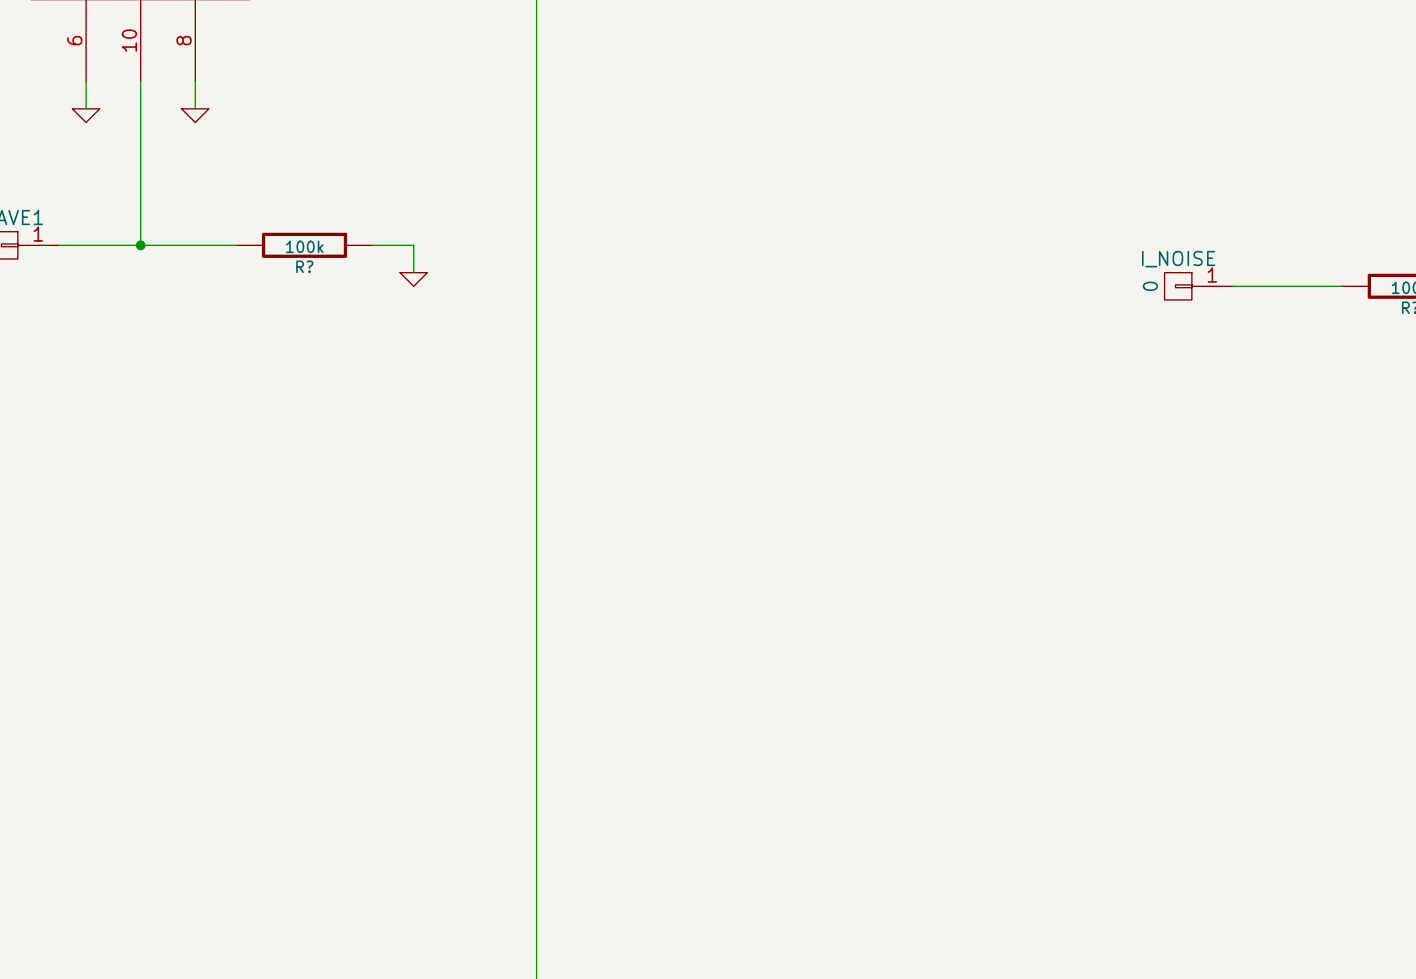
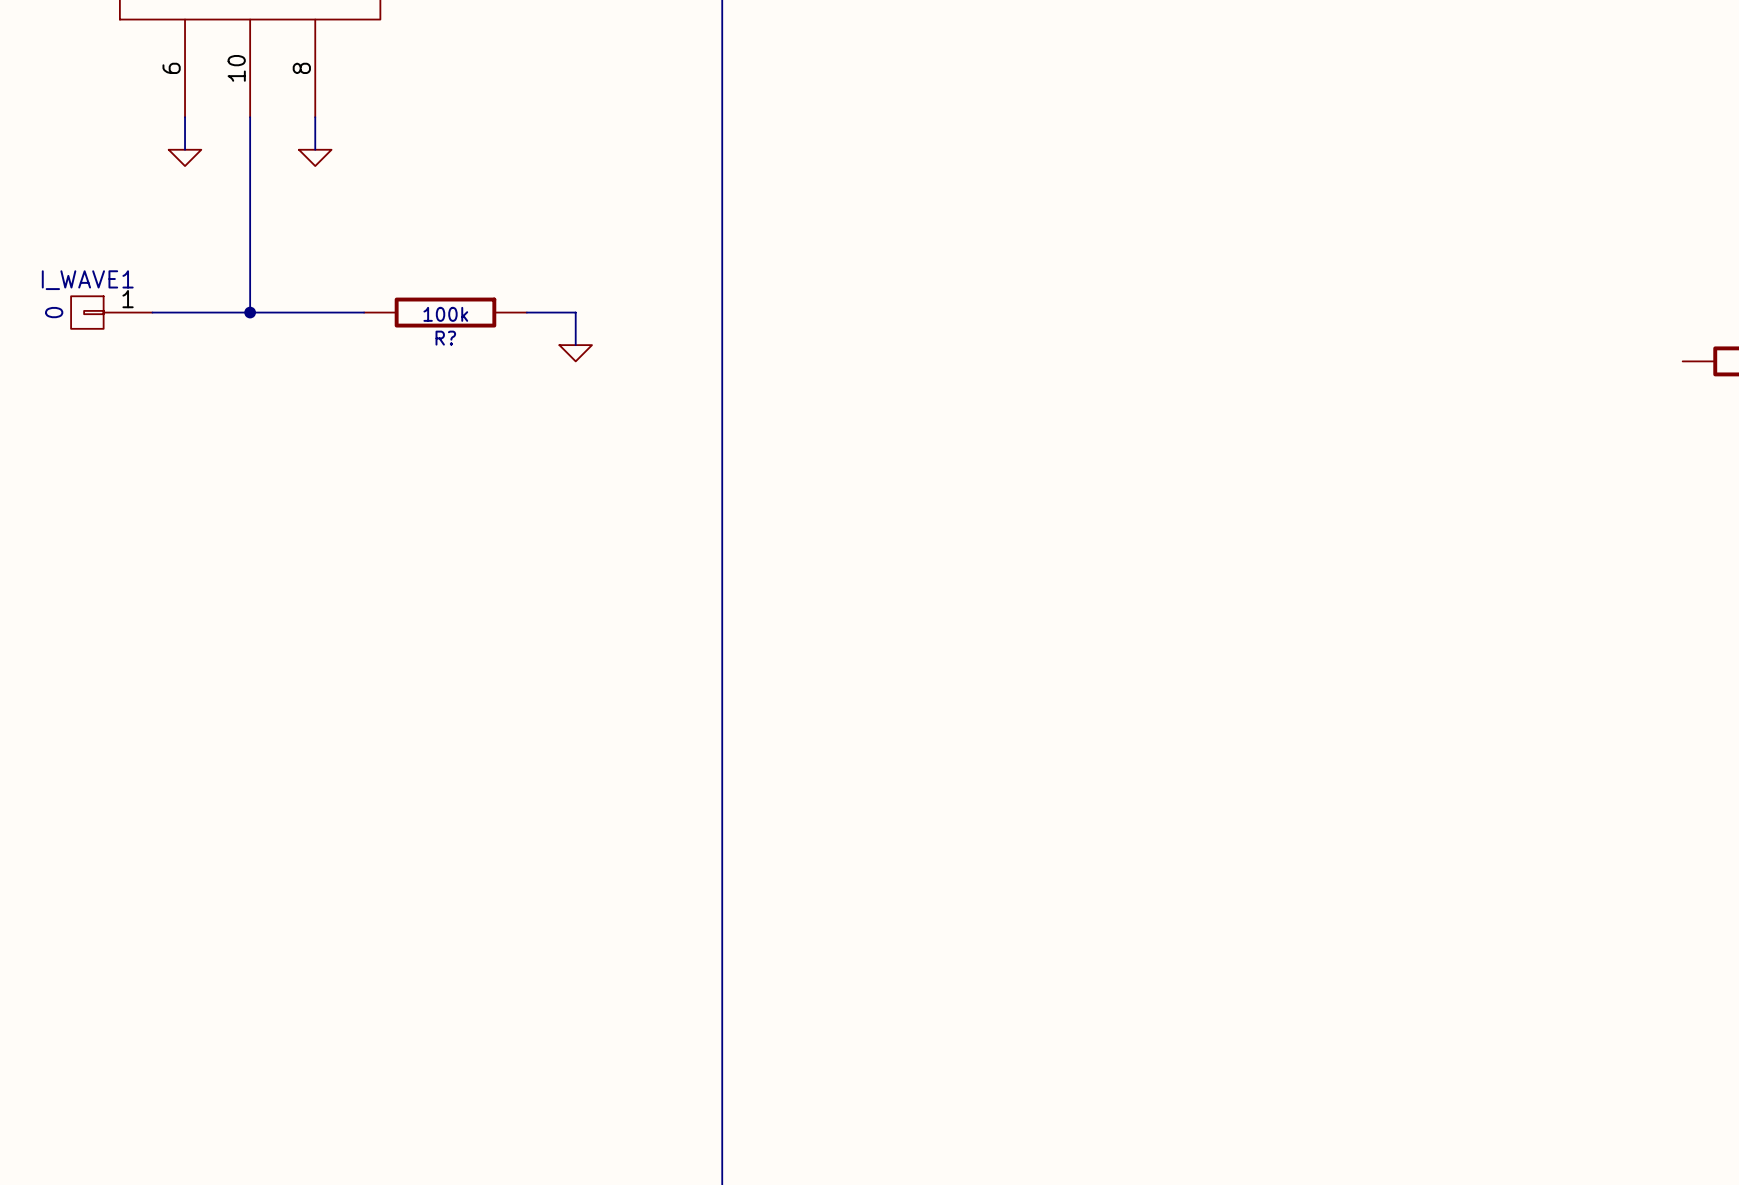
I_NOISE: 0 (1198, 286) -> none
wire: (1232, 286) (1342, 286) -> none

